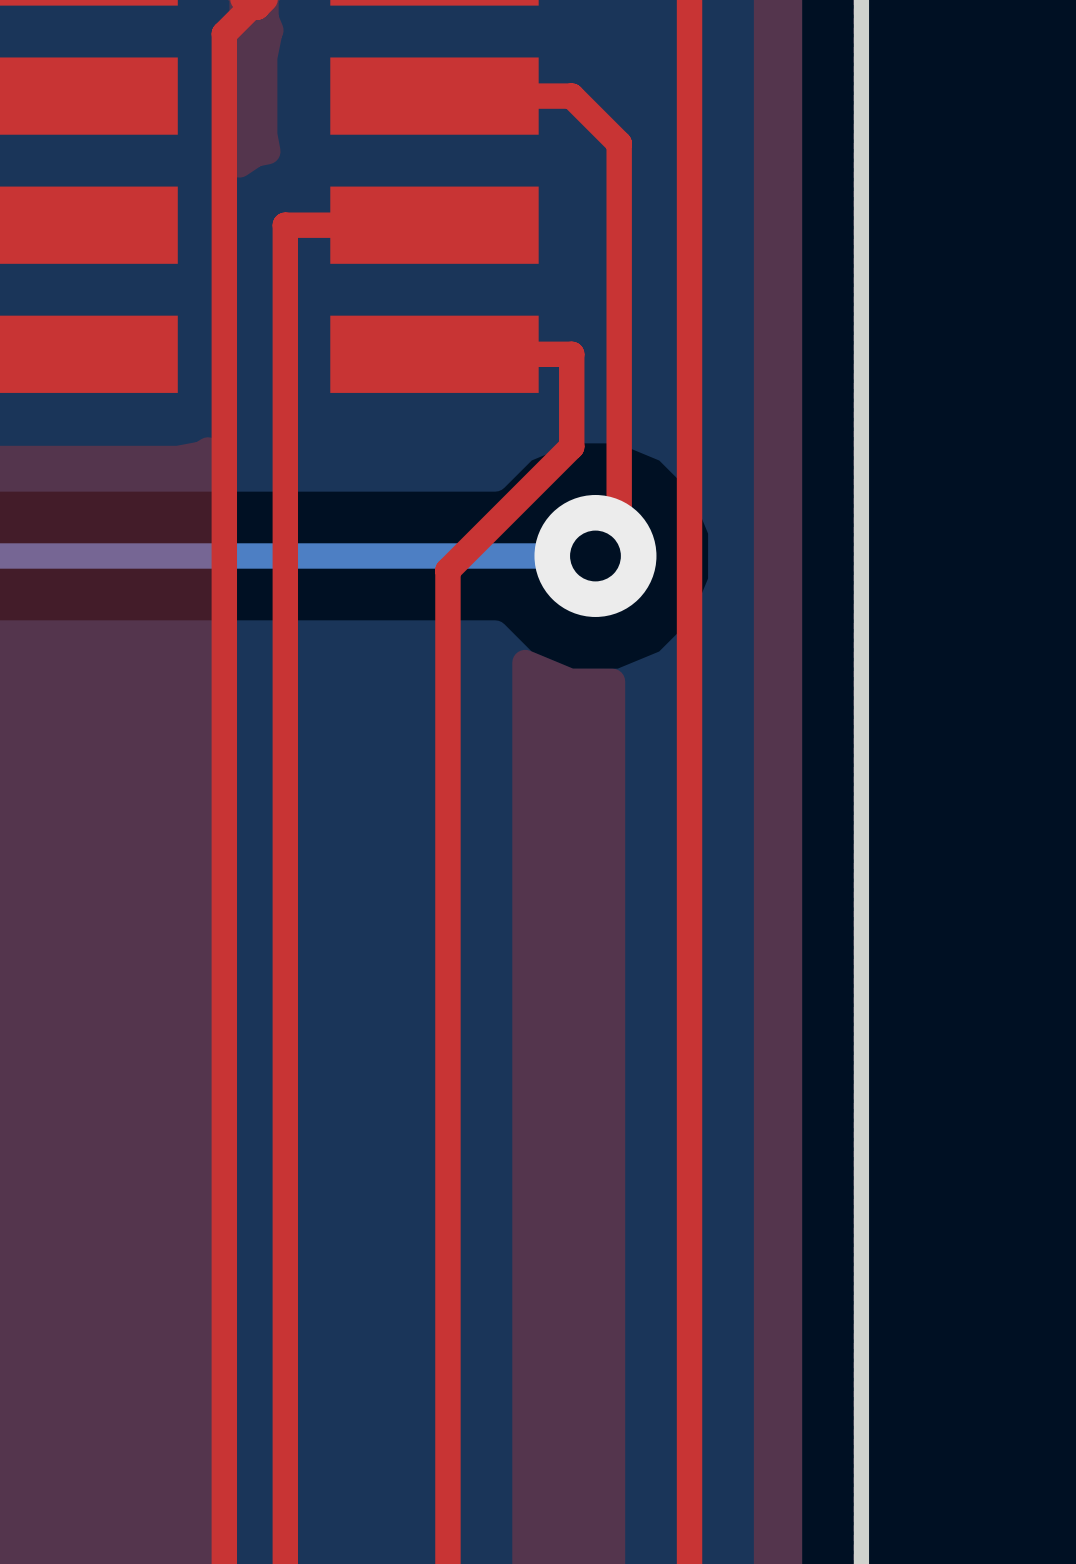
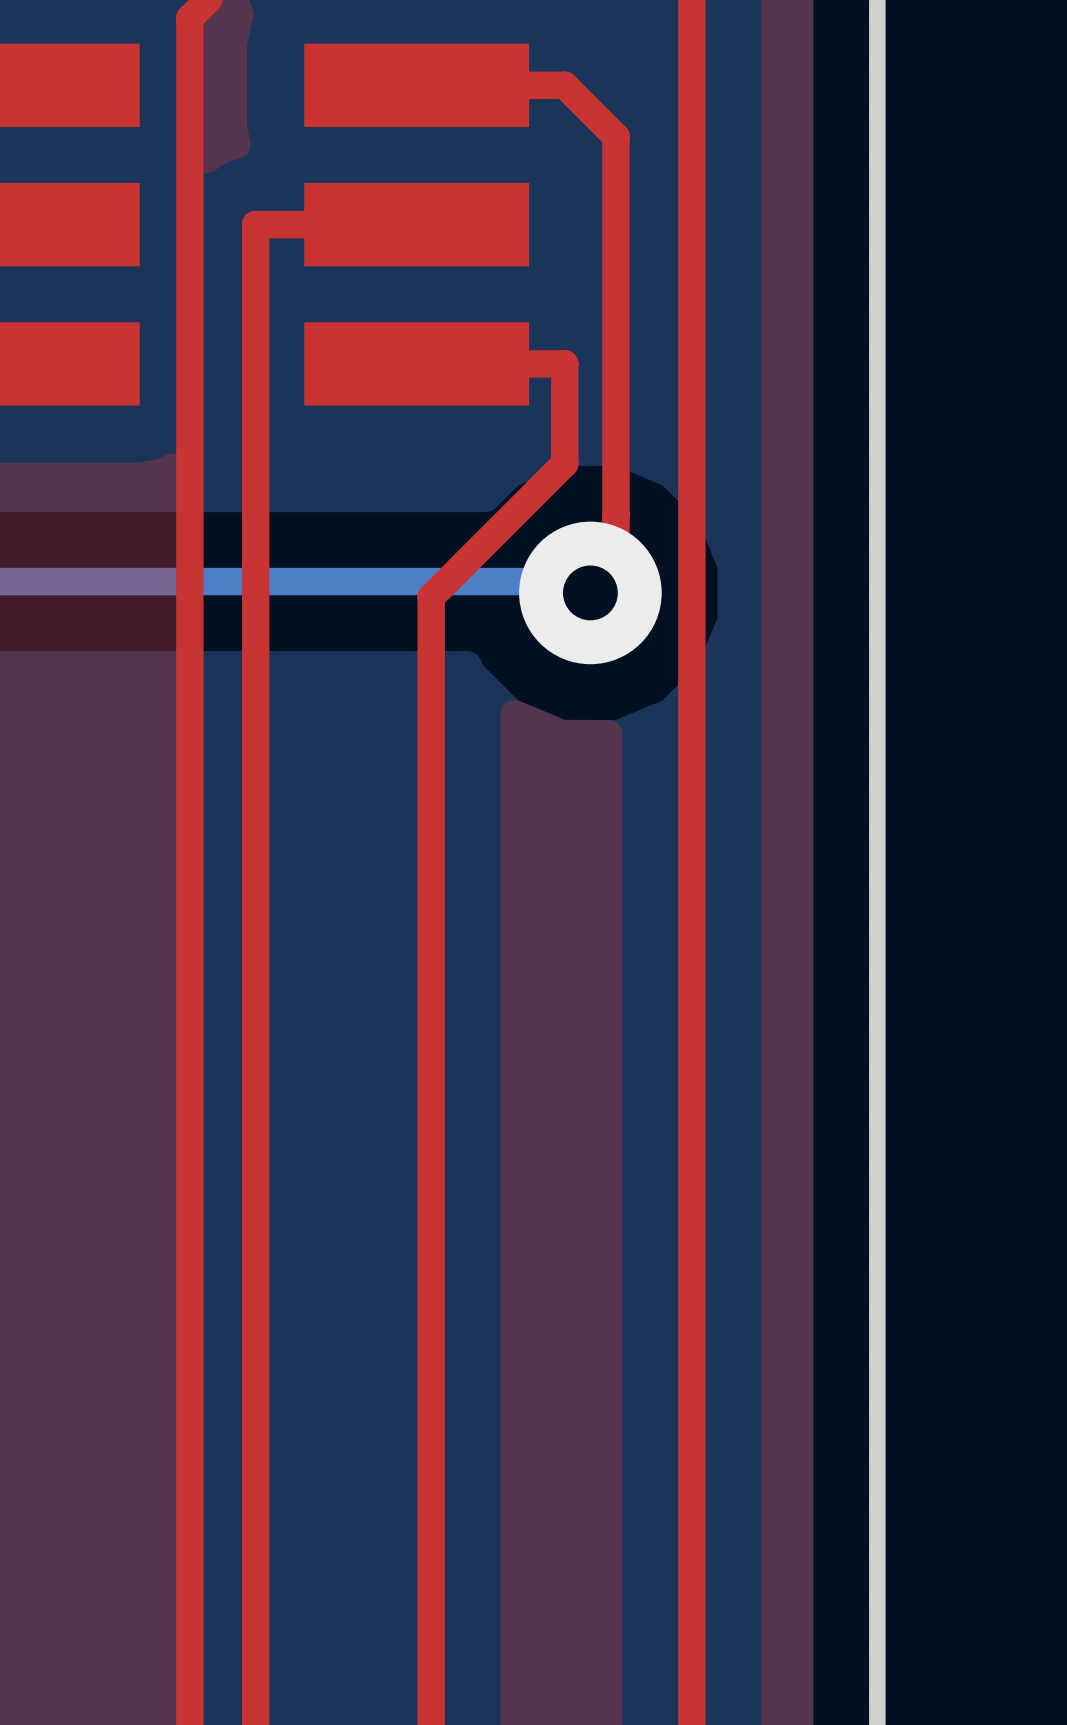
via size: [534, 495, 657, 617] -> [519, 521, 662, 665]

